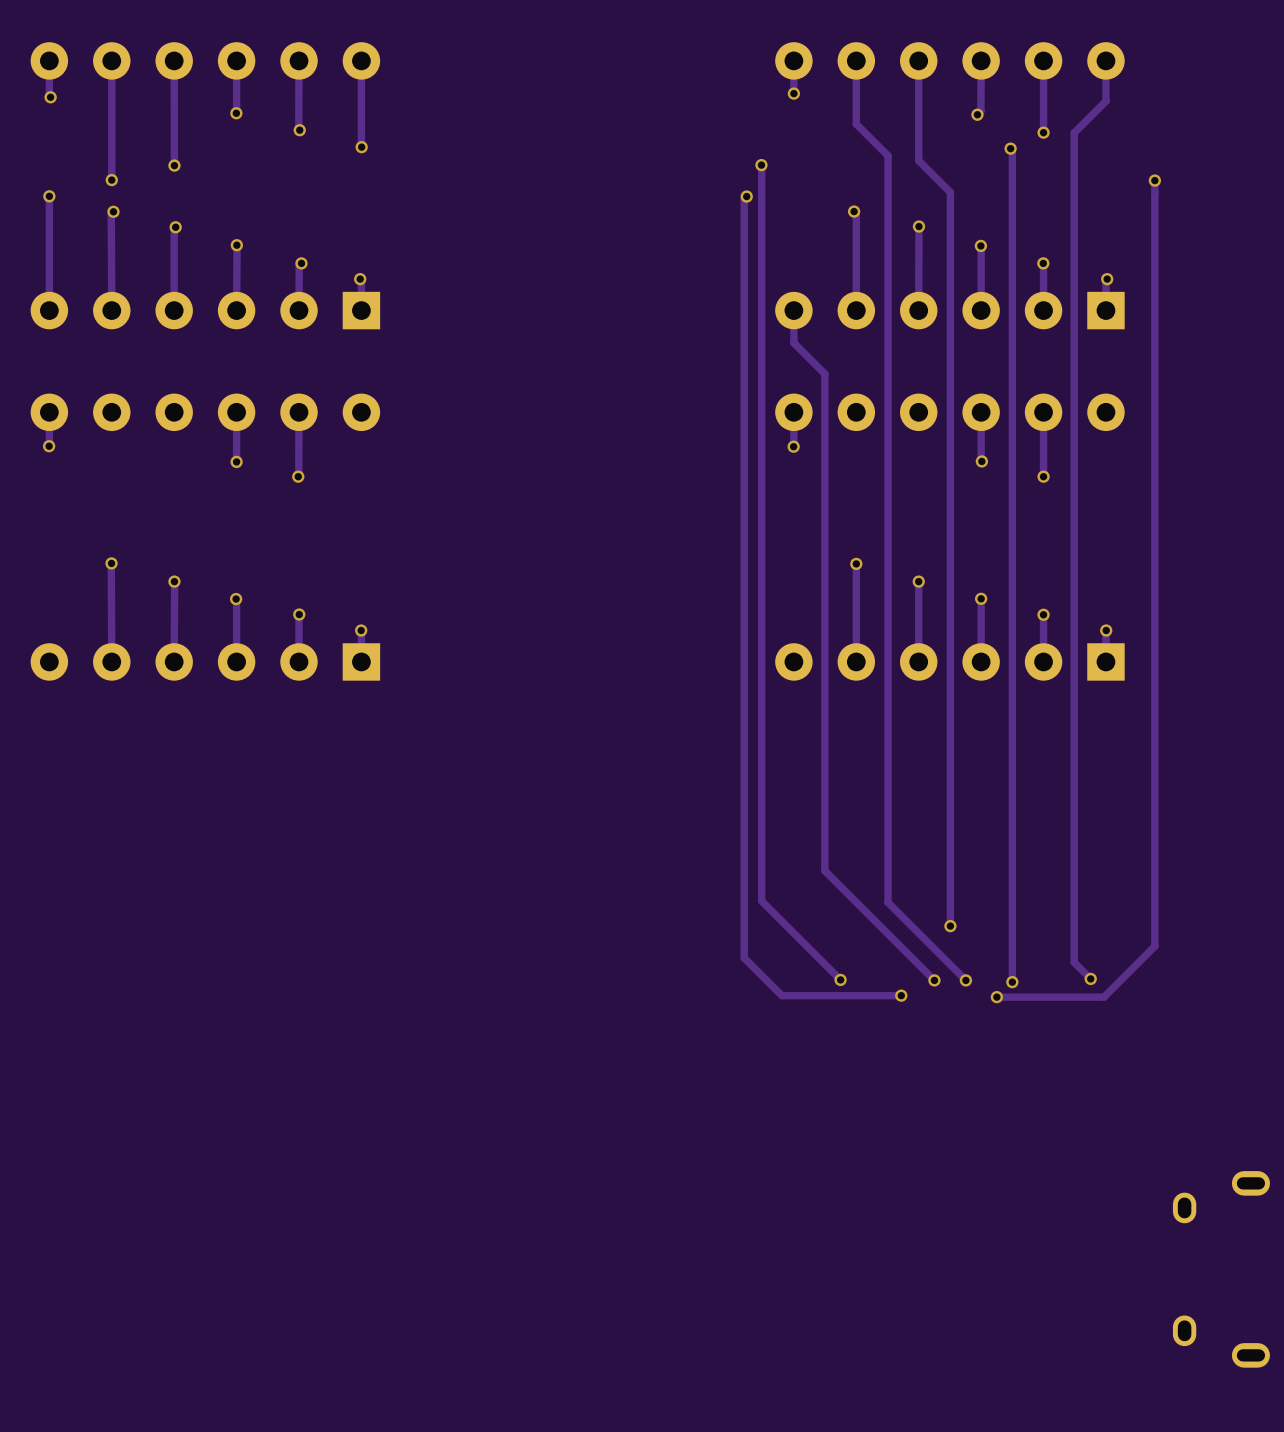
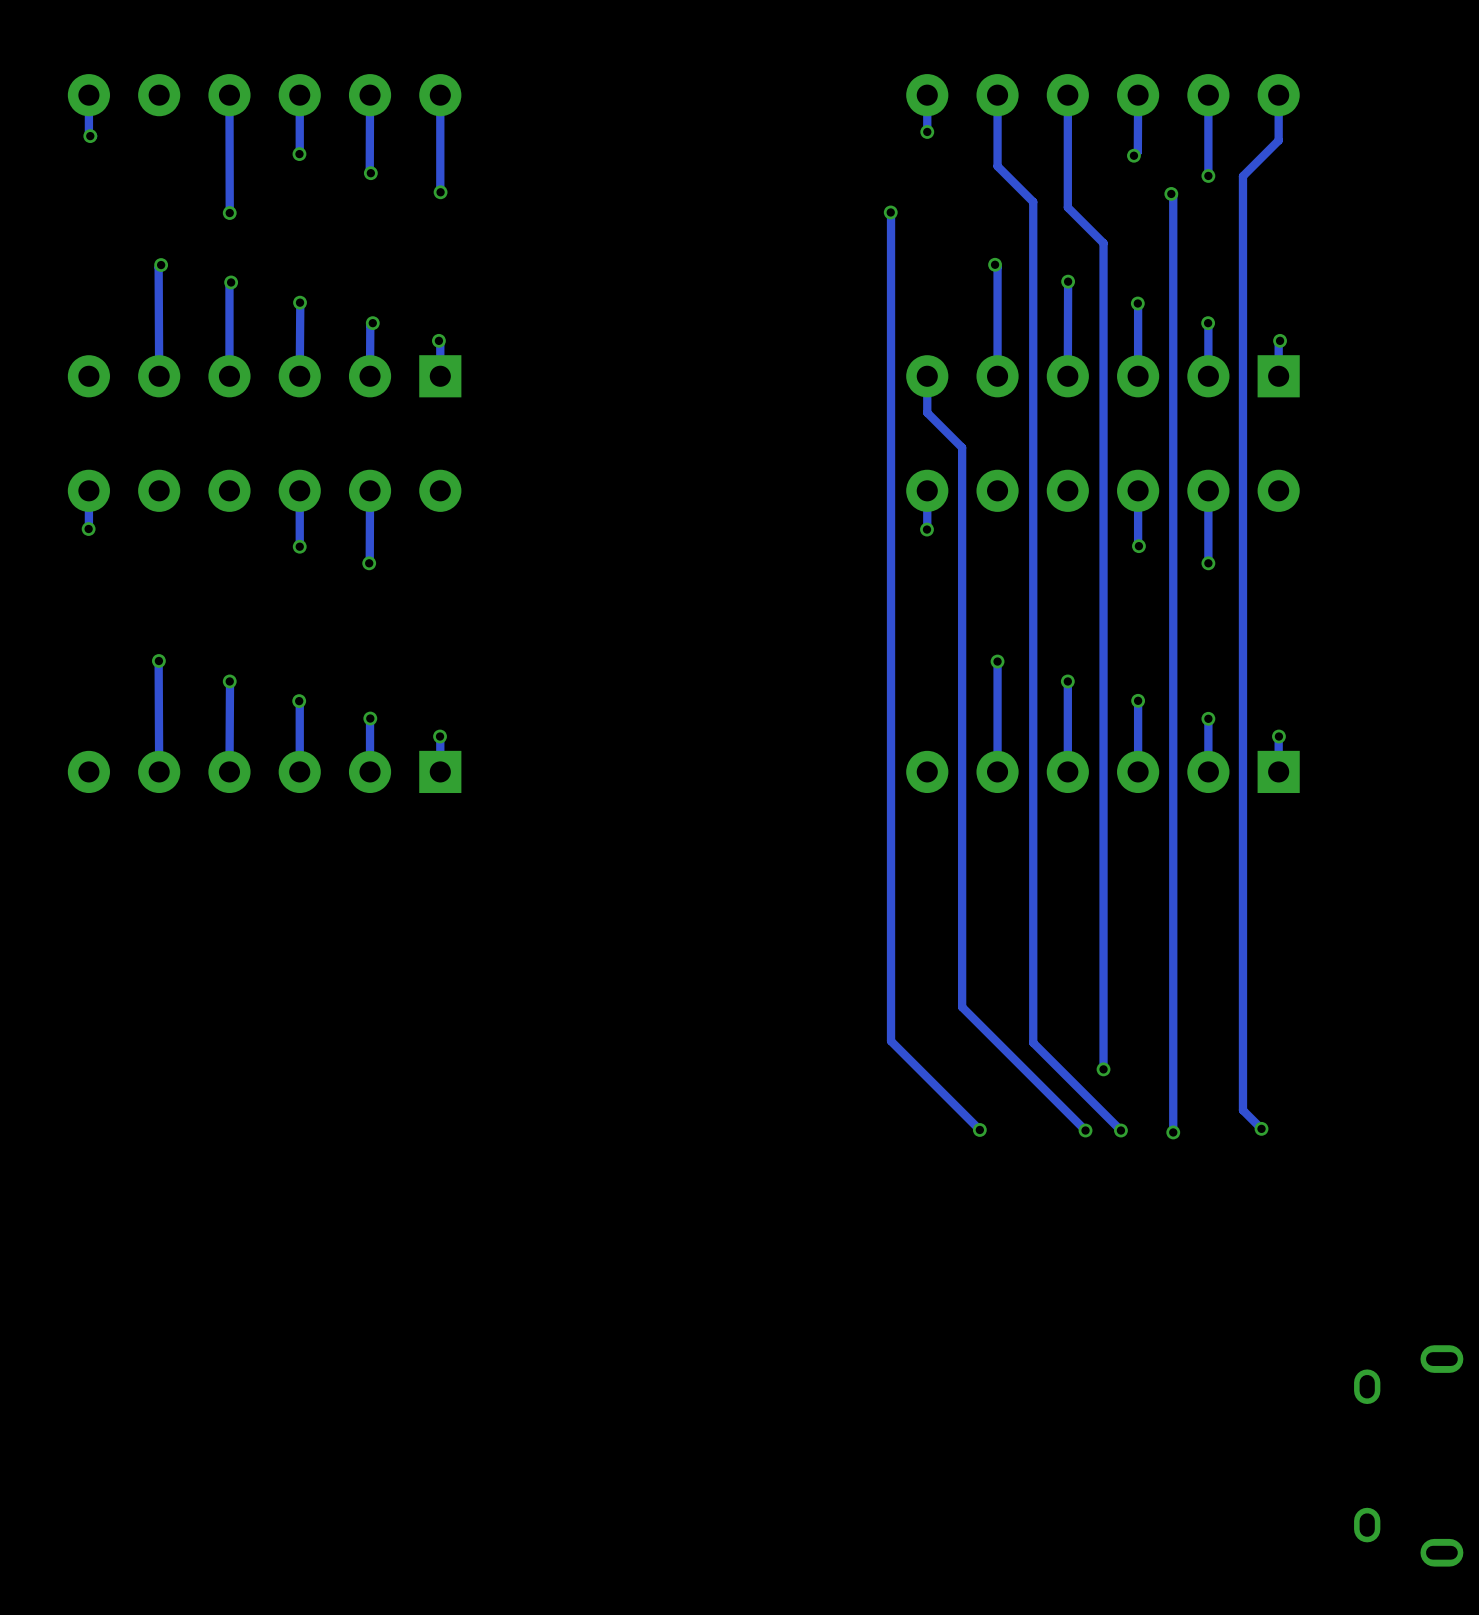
track: (111, 60) (111, 180) -> none
via: (111, 180) -> none
track: (1154, 180) (1154, 946) (1104, 997) (996, 997) -> none
via: (1154, 180) -> none
track: (49, 196) (49, 310) -> none
via: (49, 196) -> none
track: (746, 196) (744, 199) (744, 958) (781, 995) (901, 995) -> none
via: (746, 196) -> none
via: (901, 995) -> none
via: (996, 997) -> none

